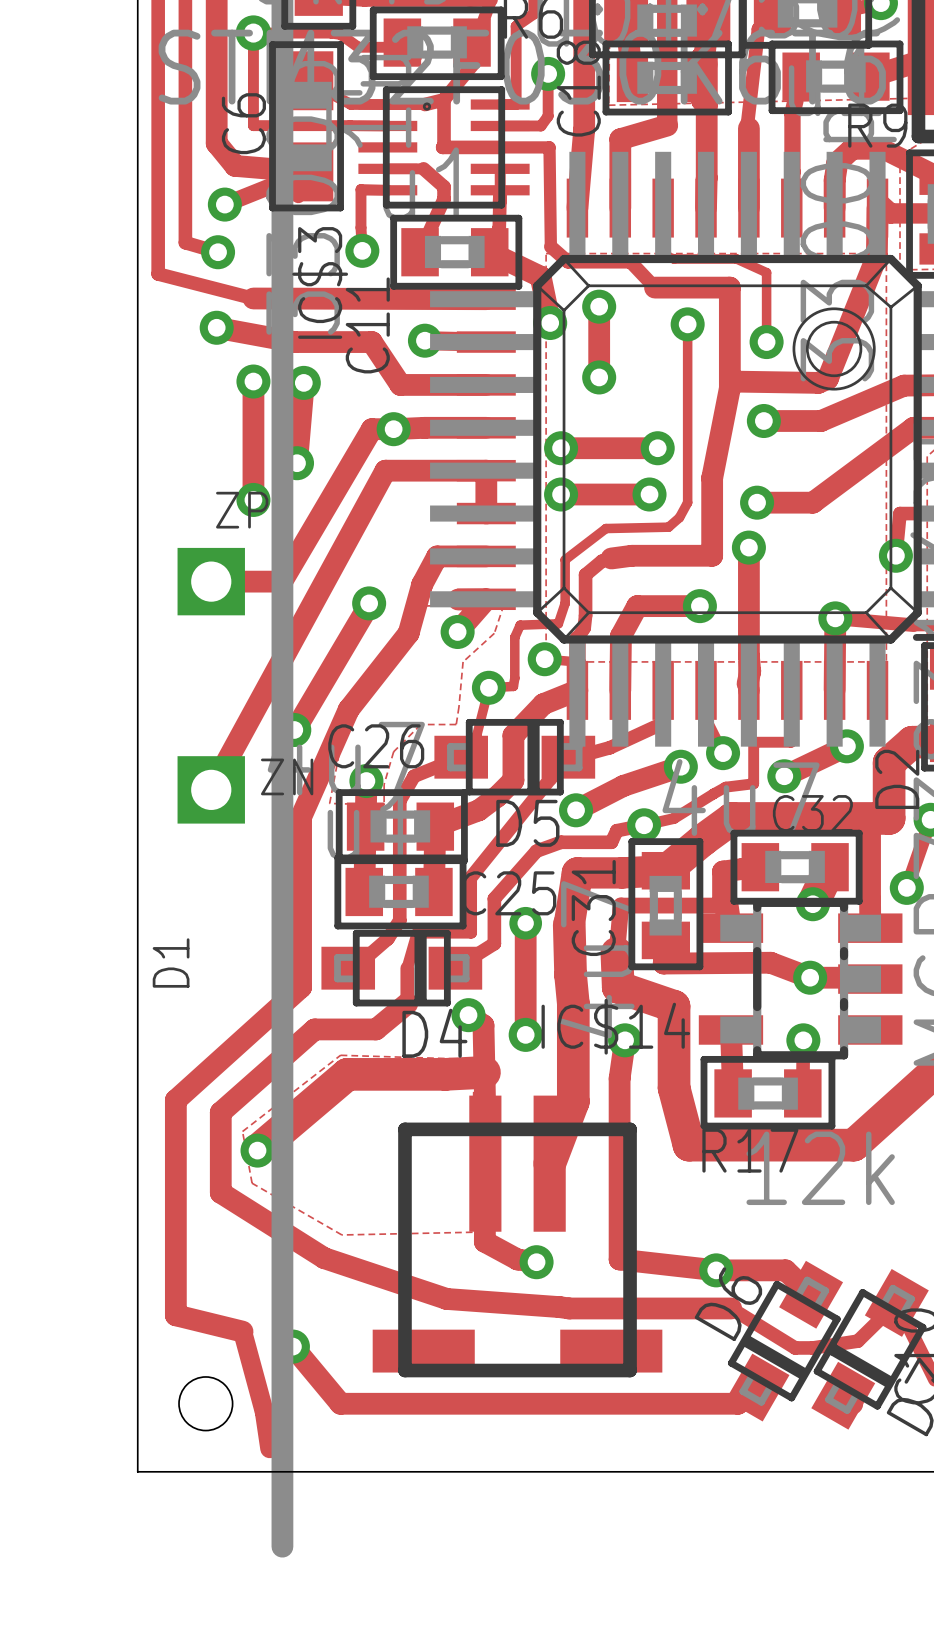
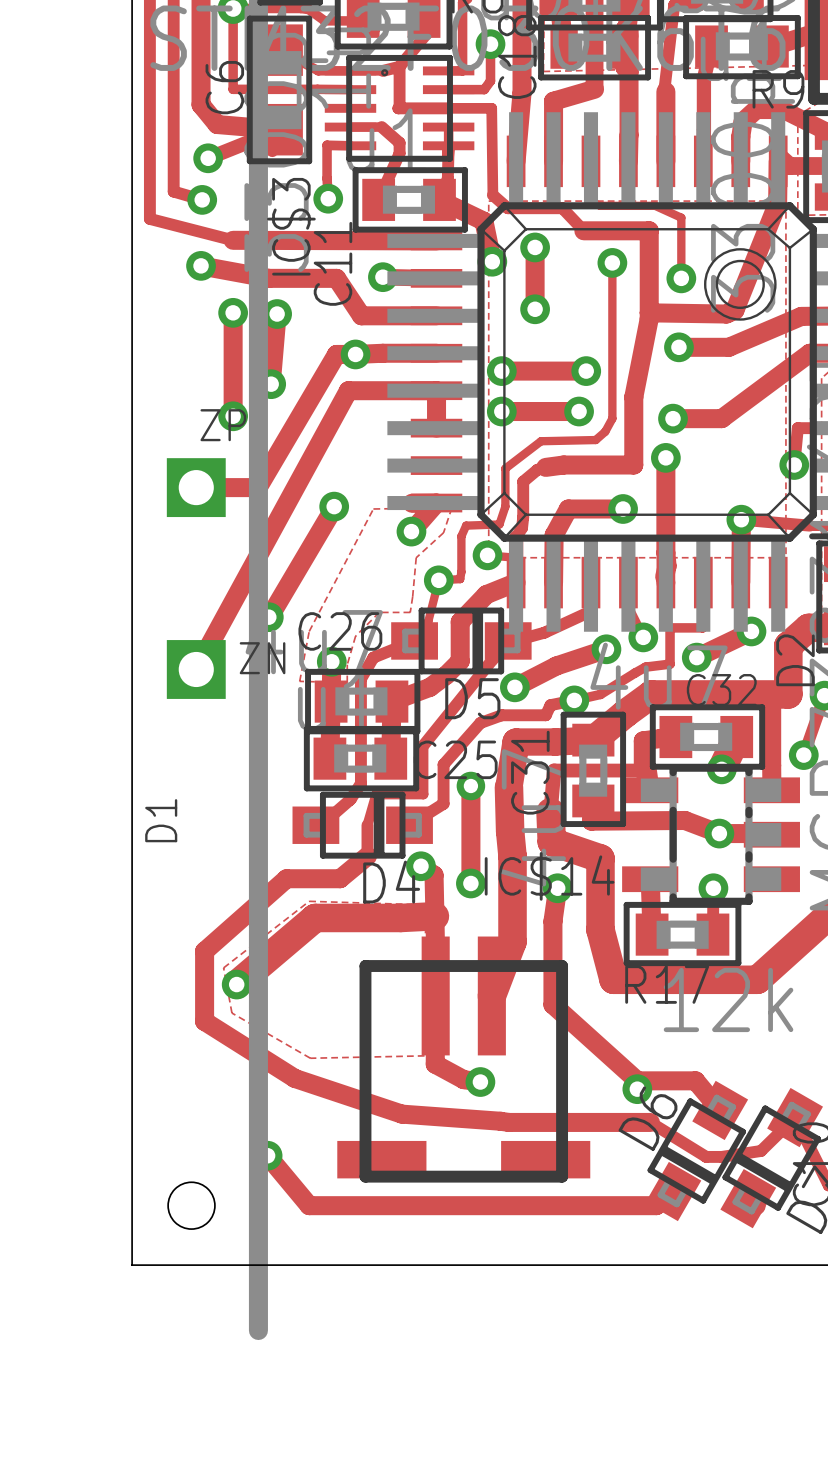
track: (486, 556) (437, 556) (422, 584) (408, 633) (348, 709) (301, 817) (301, 987) (175, 1100) (175, 1315) (242, 1331) (264, 1411) (269, 1448) -> none
track: (619, 1173) (619, 1259) (716, 1270) (785, 1270) (811, 1294) -> (552, 1004) (637, 1080) (695, 1080) (720, 1110)

